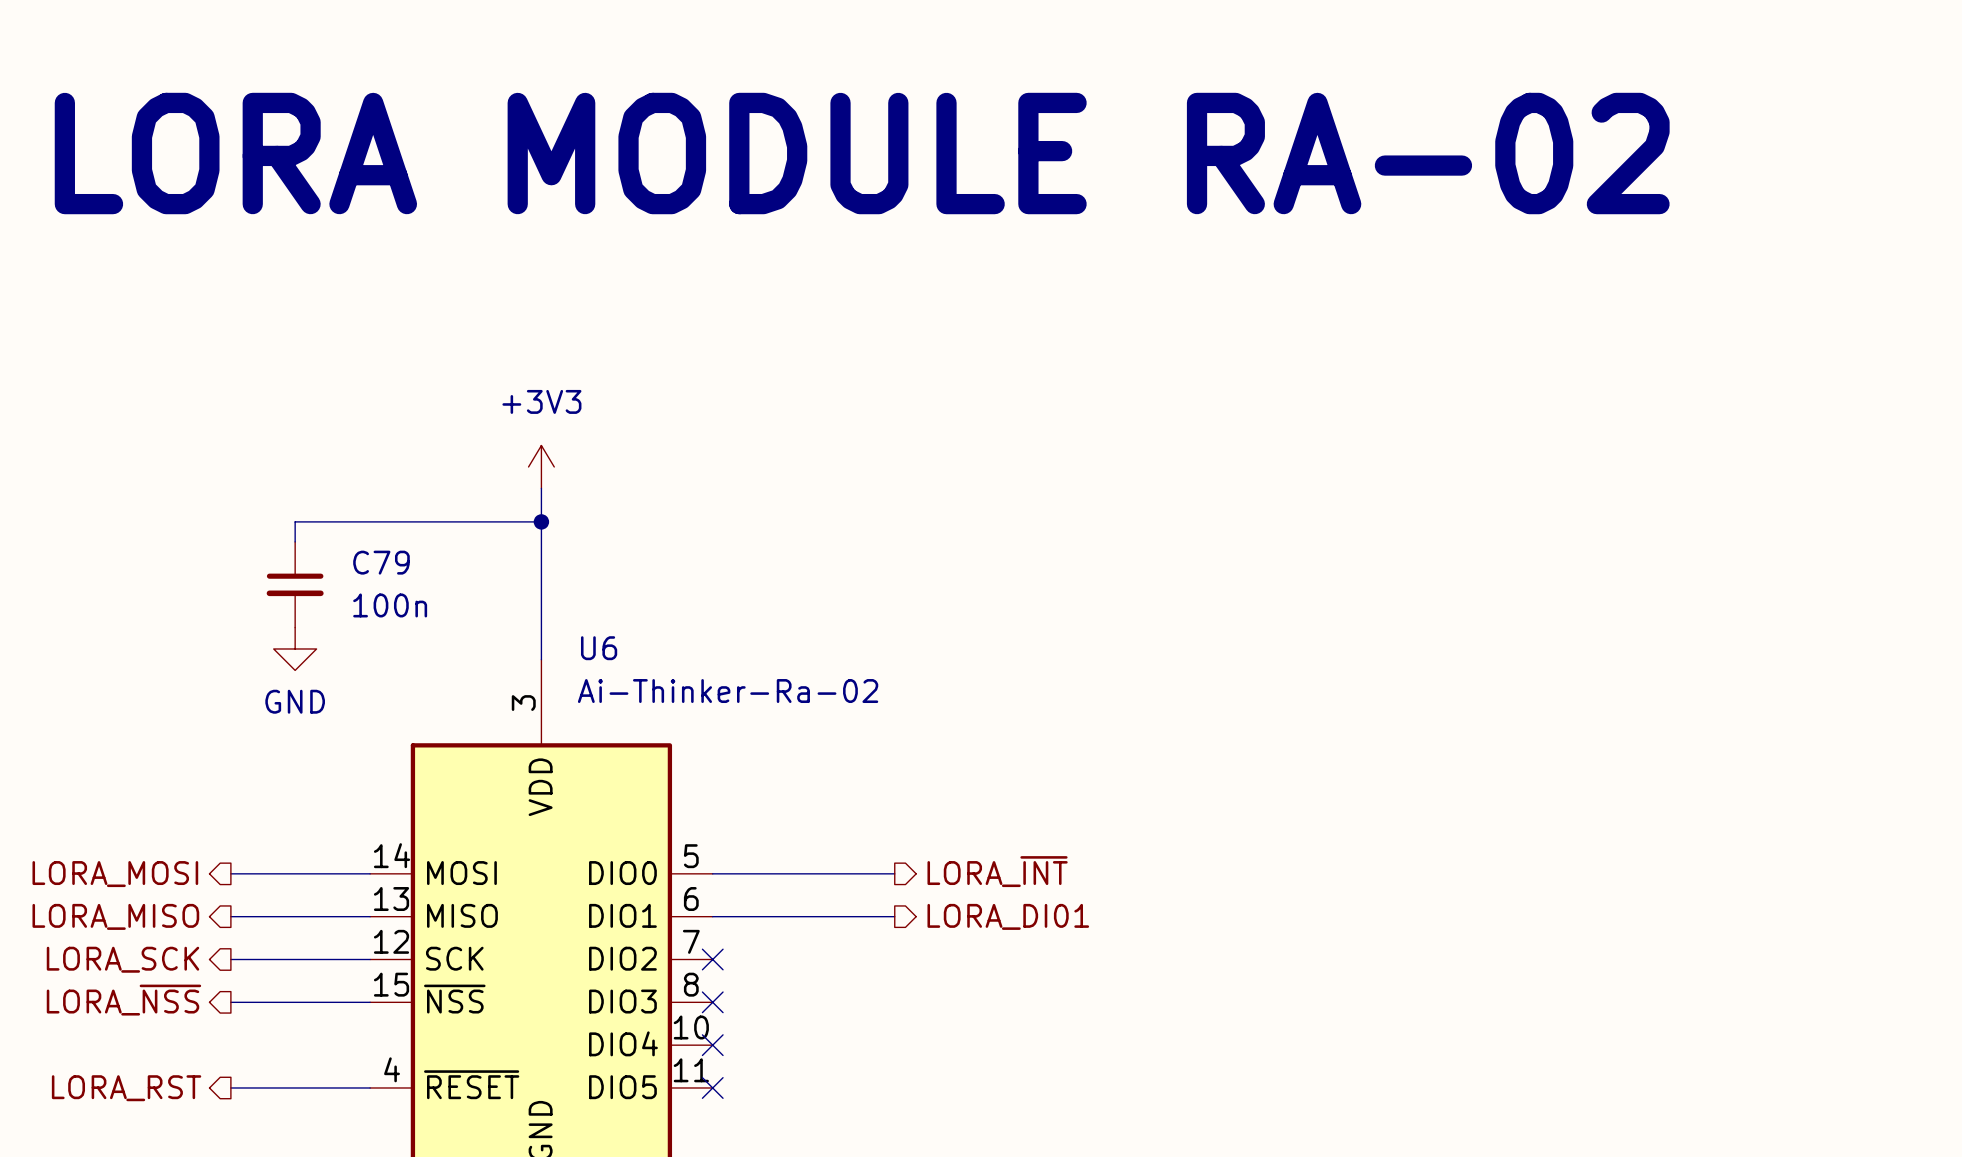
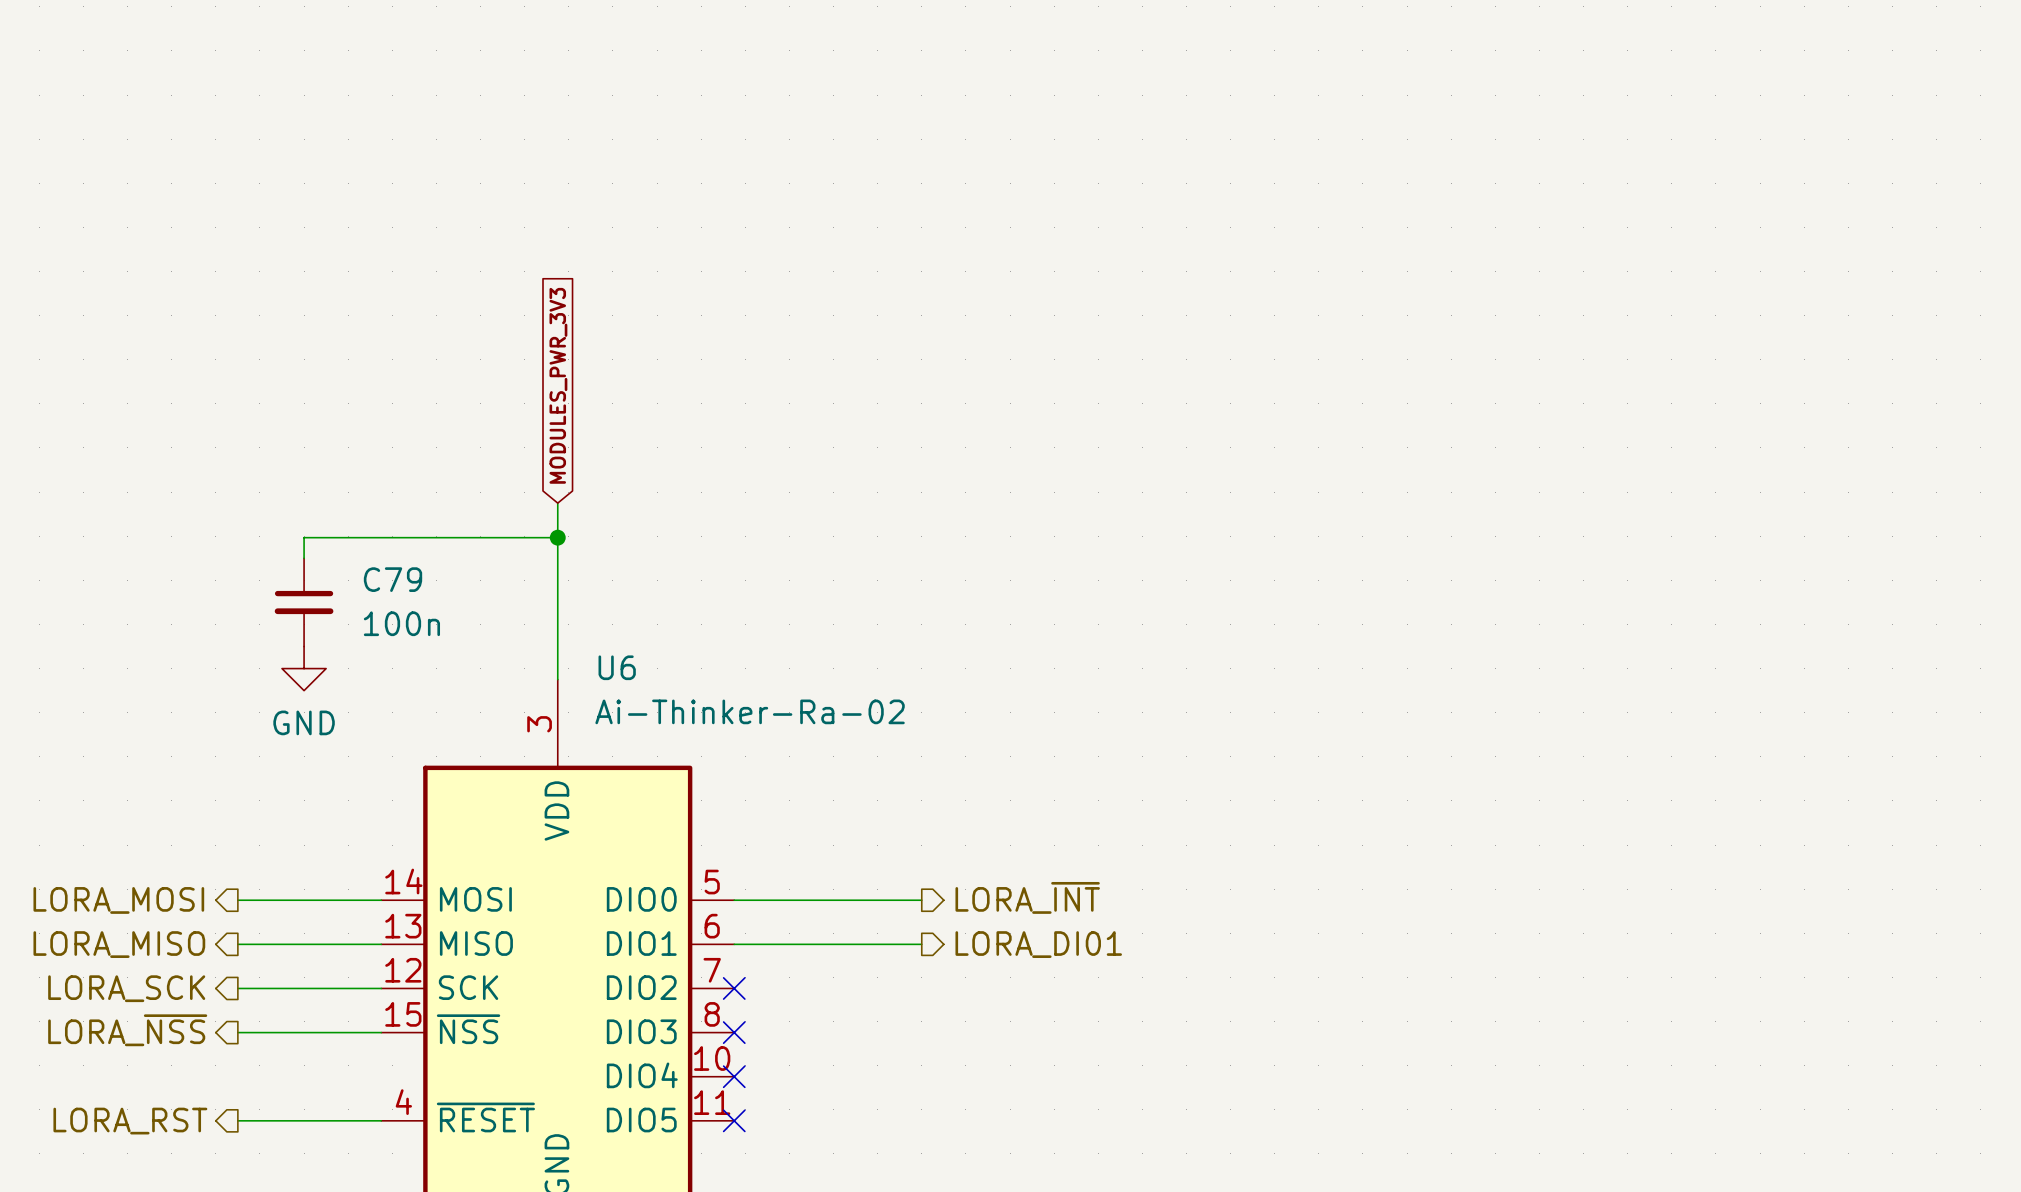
text: LORA MODULE RA-02 (862, 153) -> none
global label: none -> MODULES_PWR_3V3 (558, 385)
power symbol: +3V3 (541, 466) -> none

